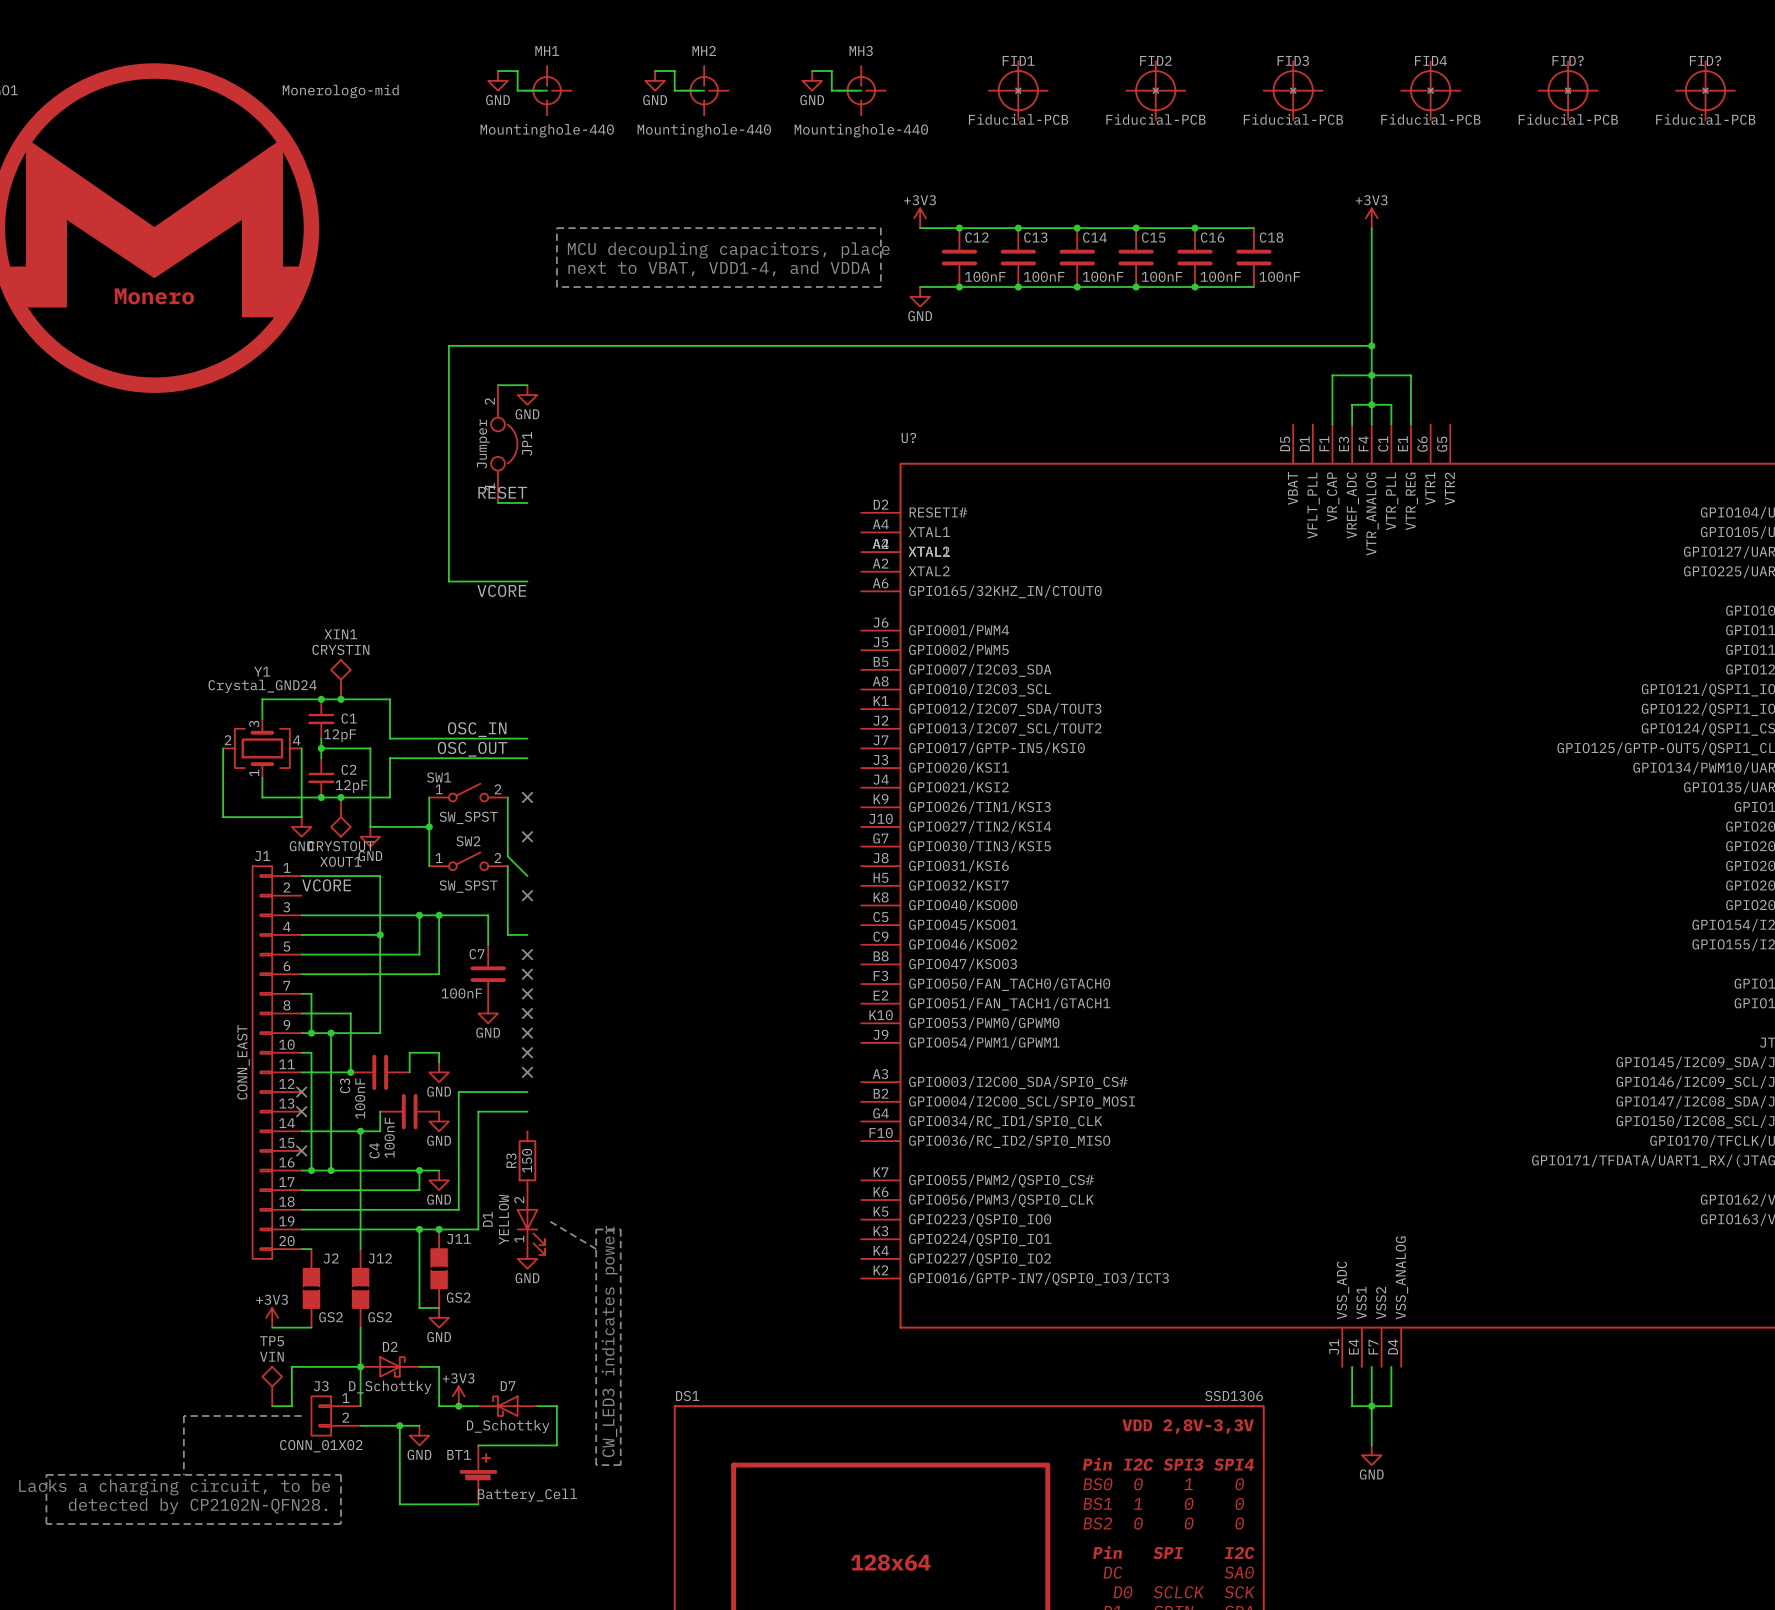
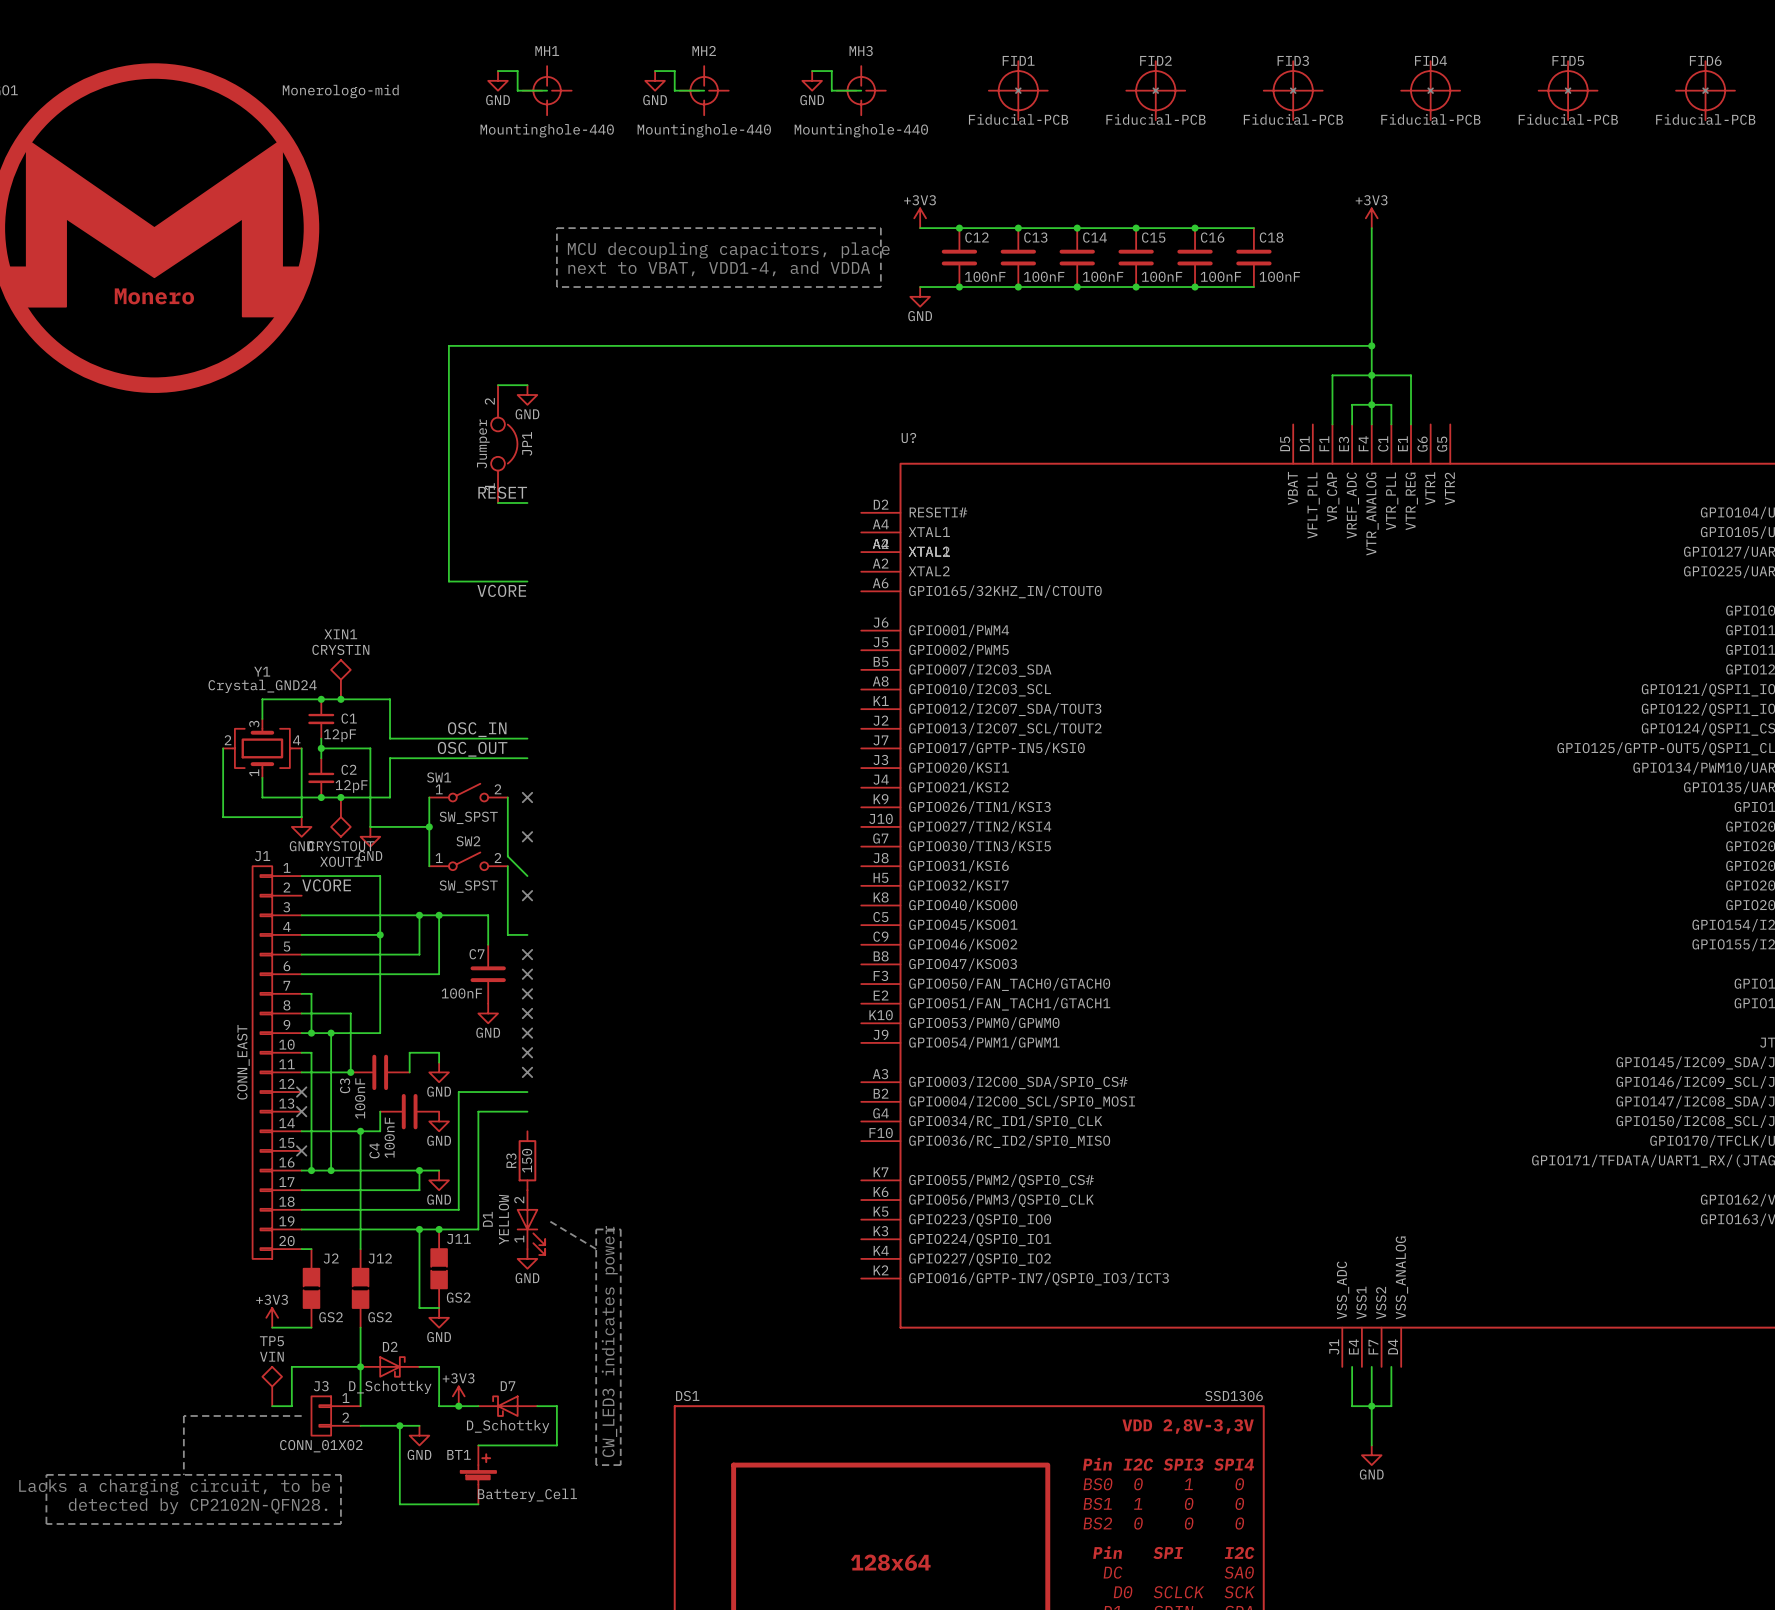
FID? name: FID? (1568, 60) -> FID5 (1568, 60)
FID? name: FID? (1705, 60) -> FID6 (1705, 60)

